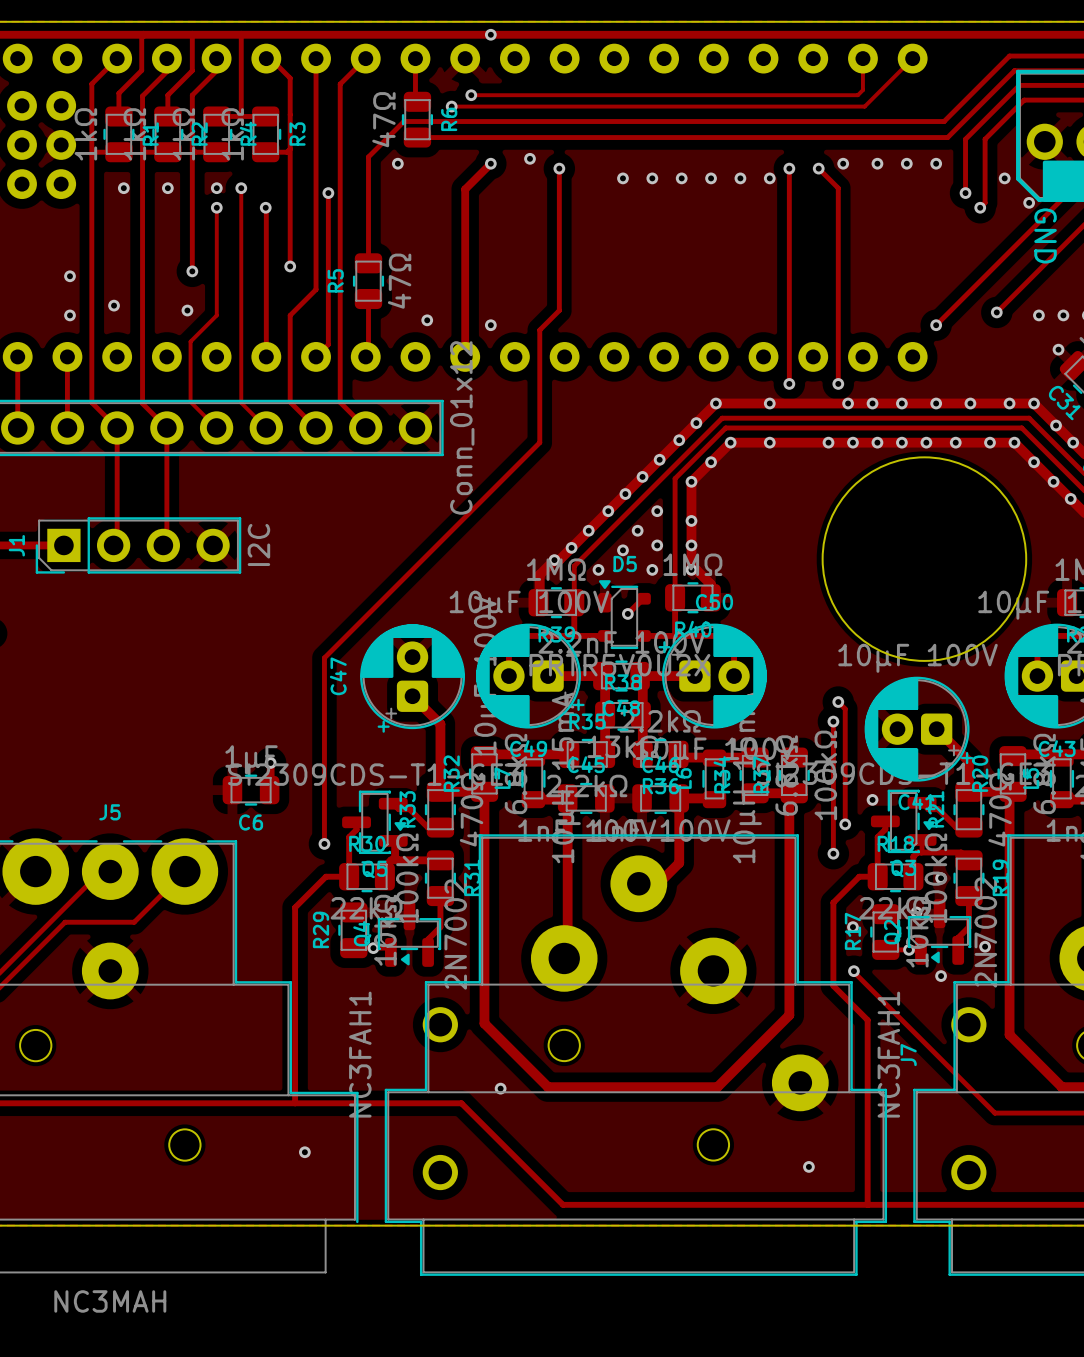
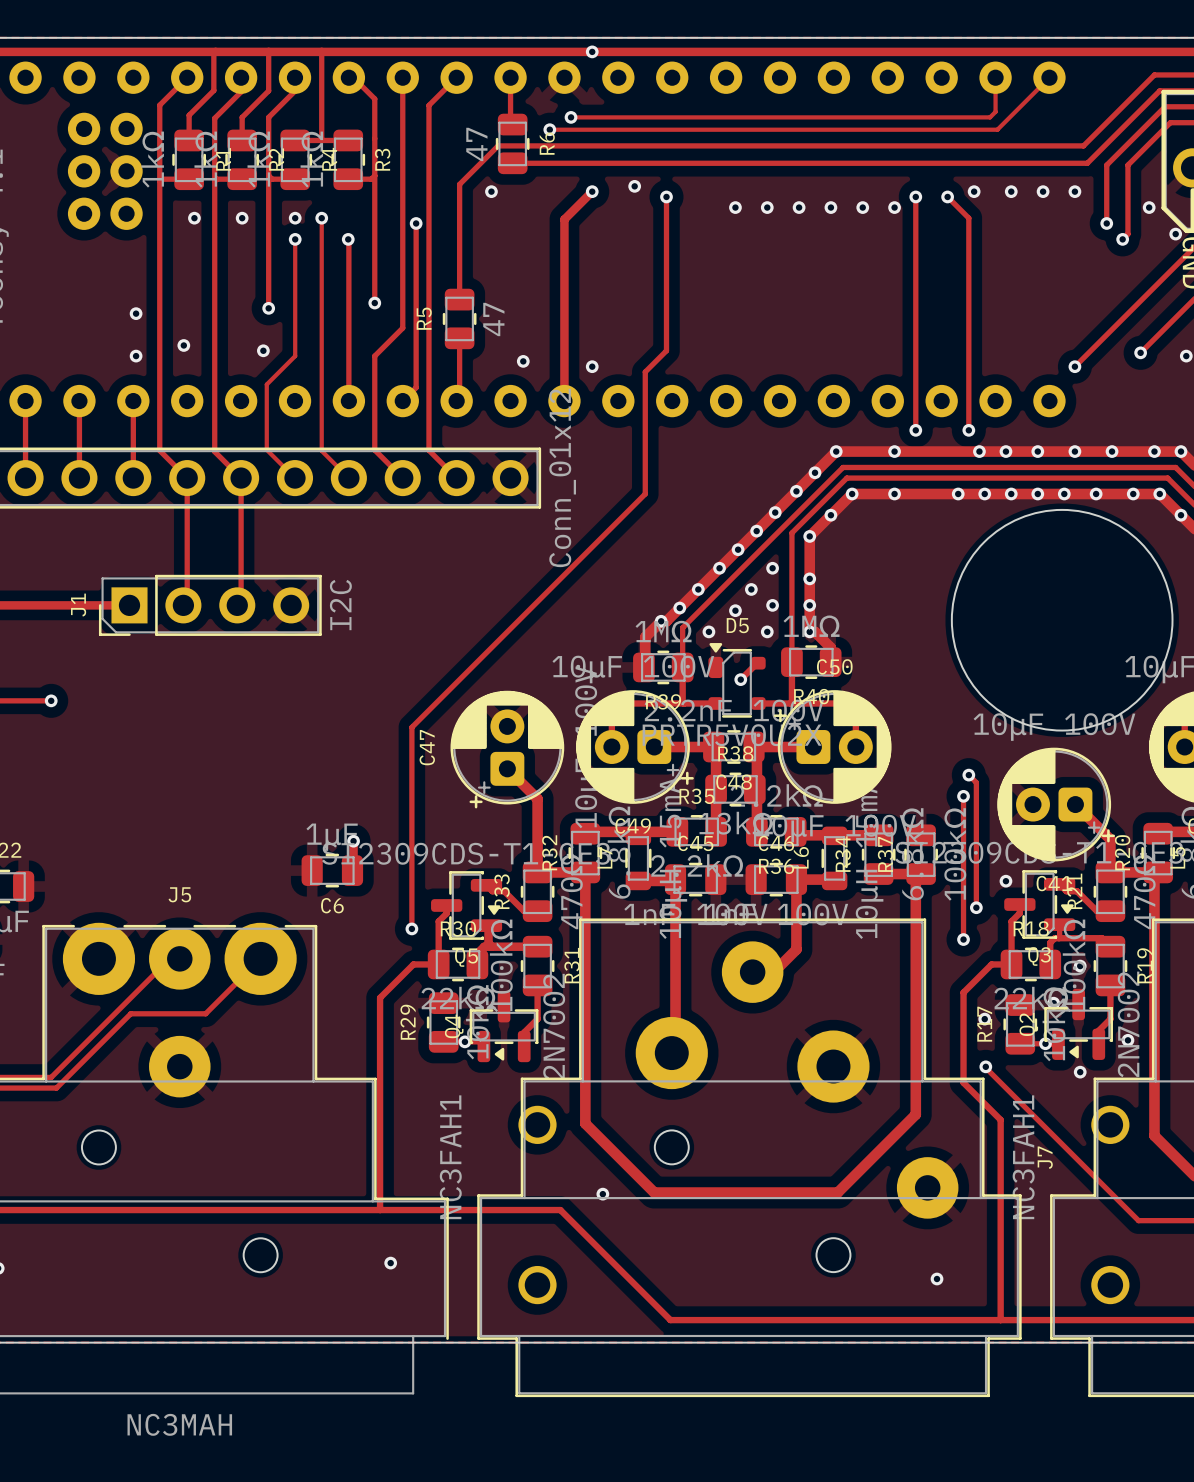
R6 value: 47Ω (383, 119) -> 47 (476, 144)
R5 value: 47Ω (399, 281) -> 47 (493, 319)

